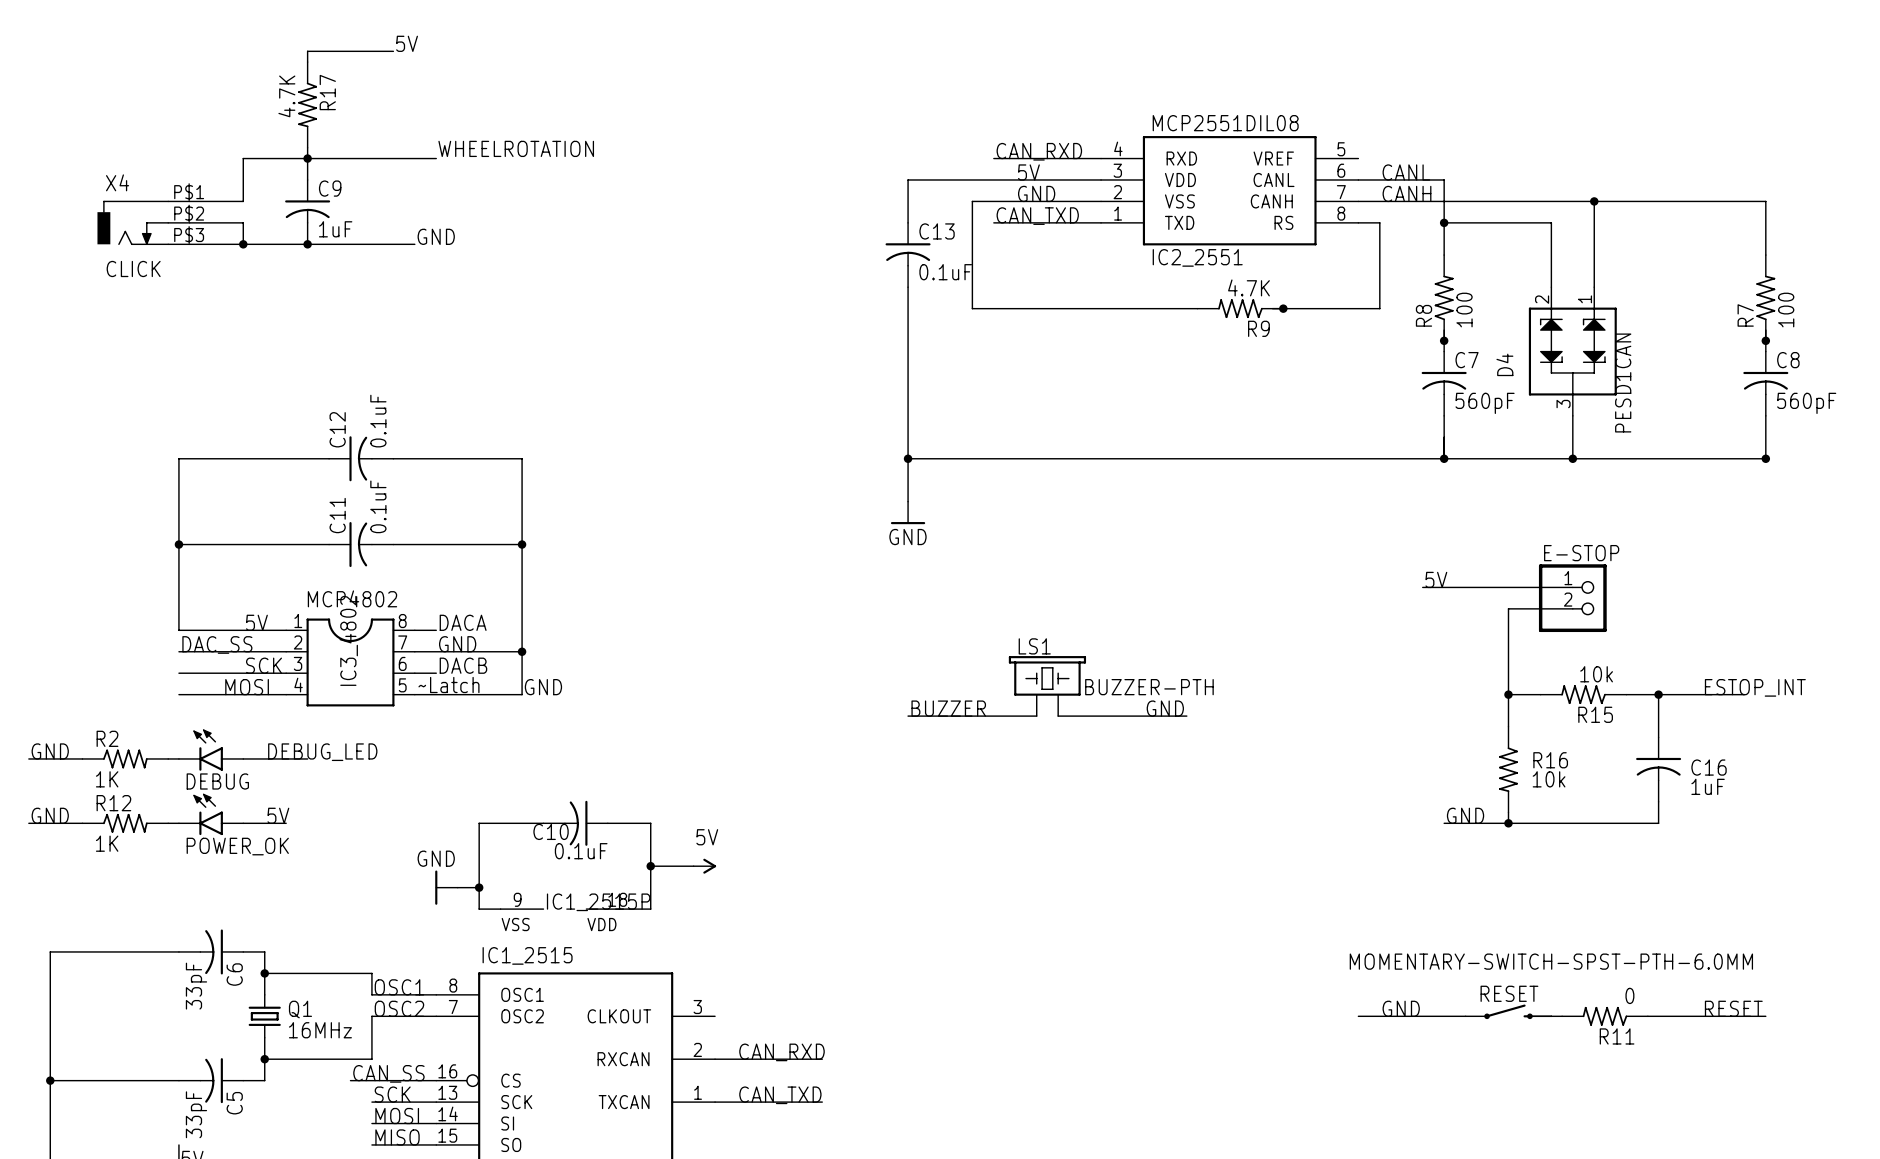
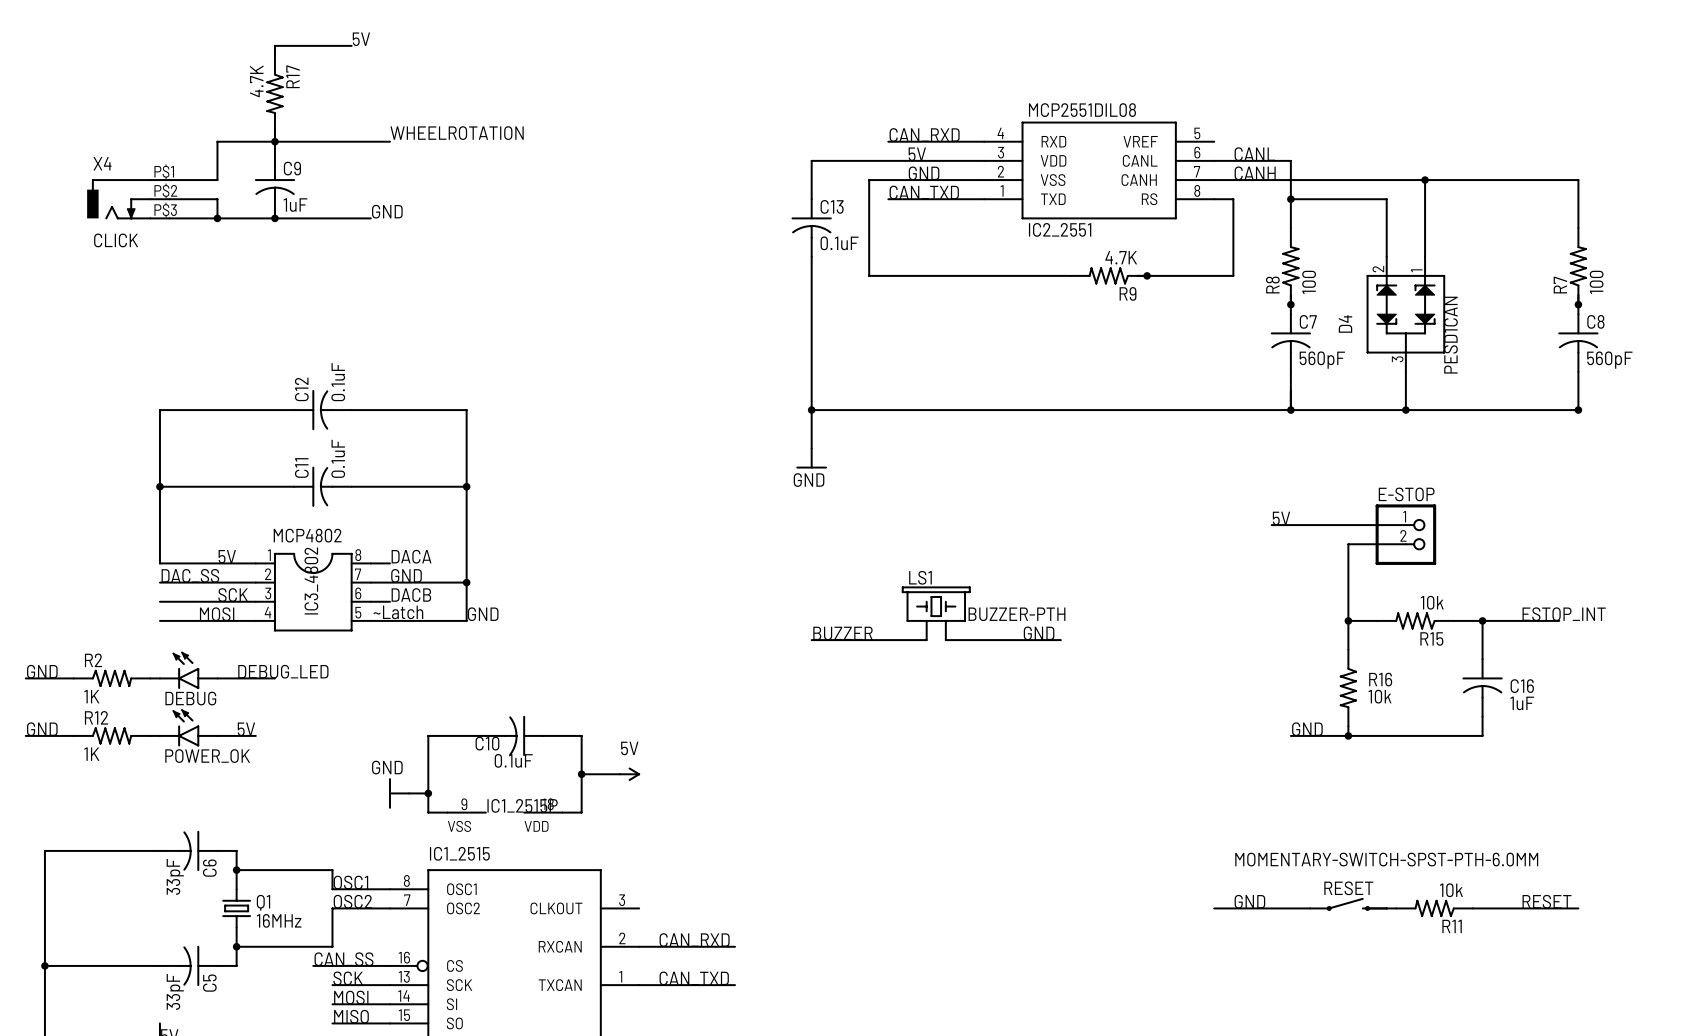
R11 value: 0 (1629, 995) -> 10k (1451, 890)

